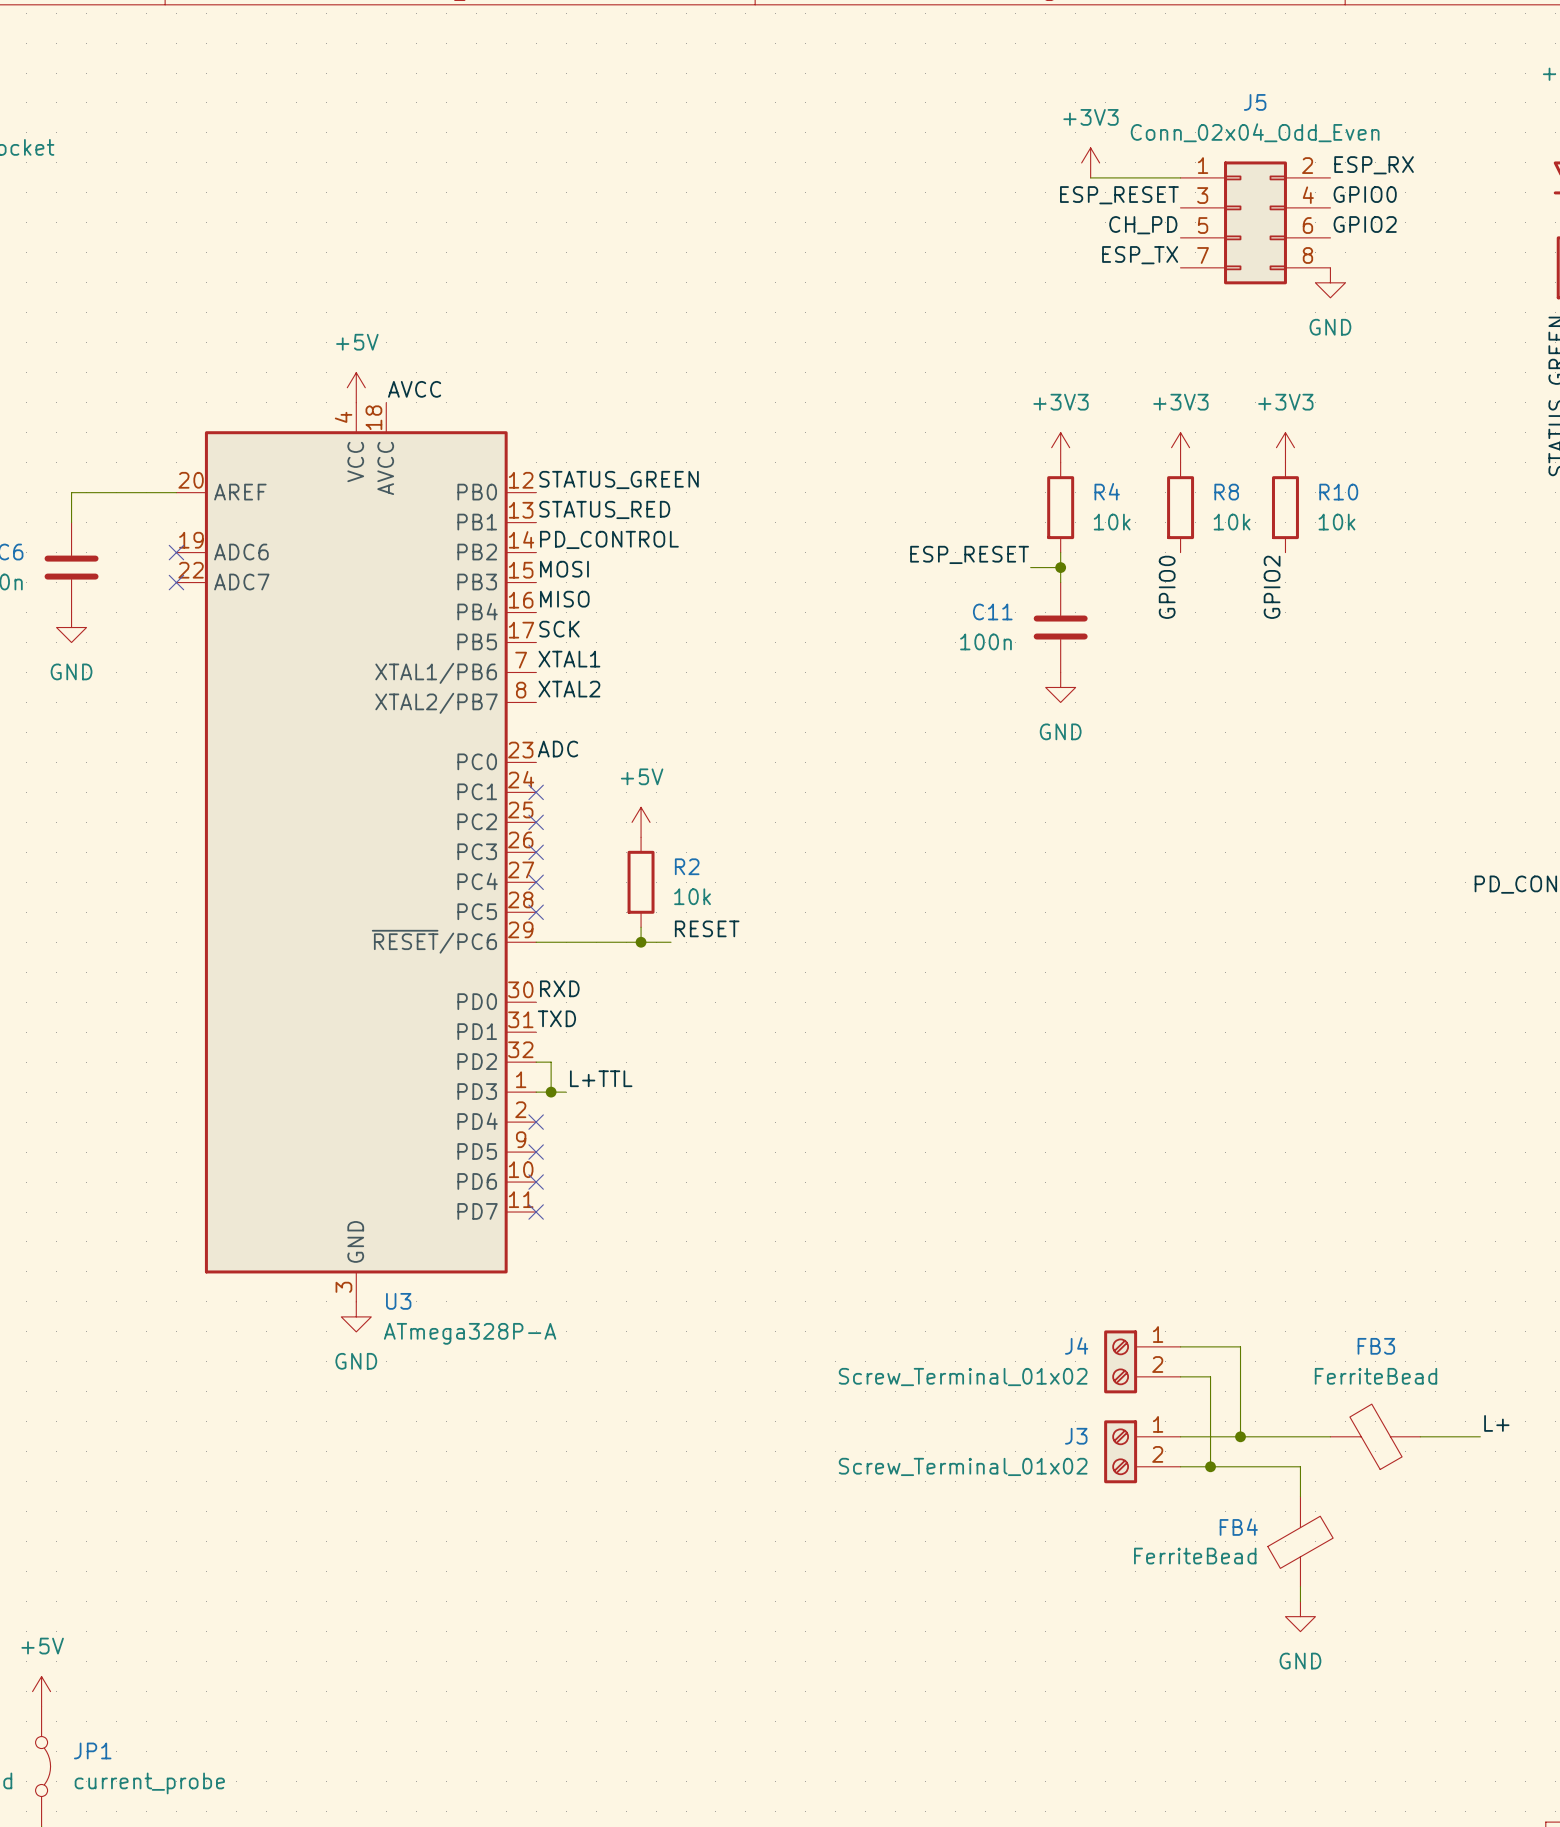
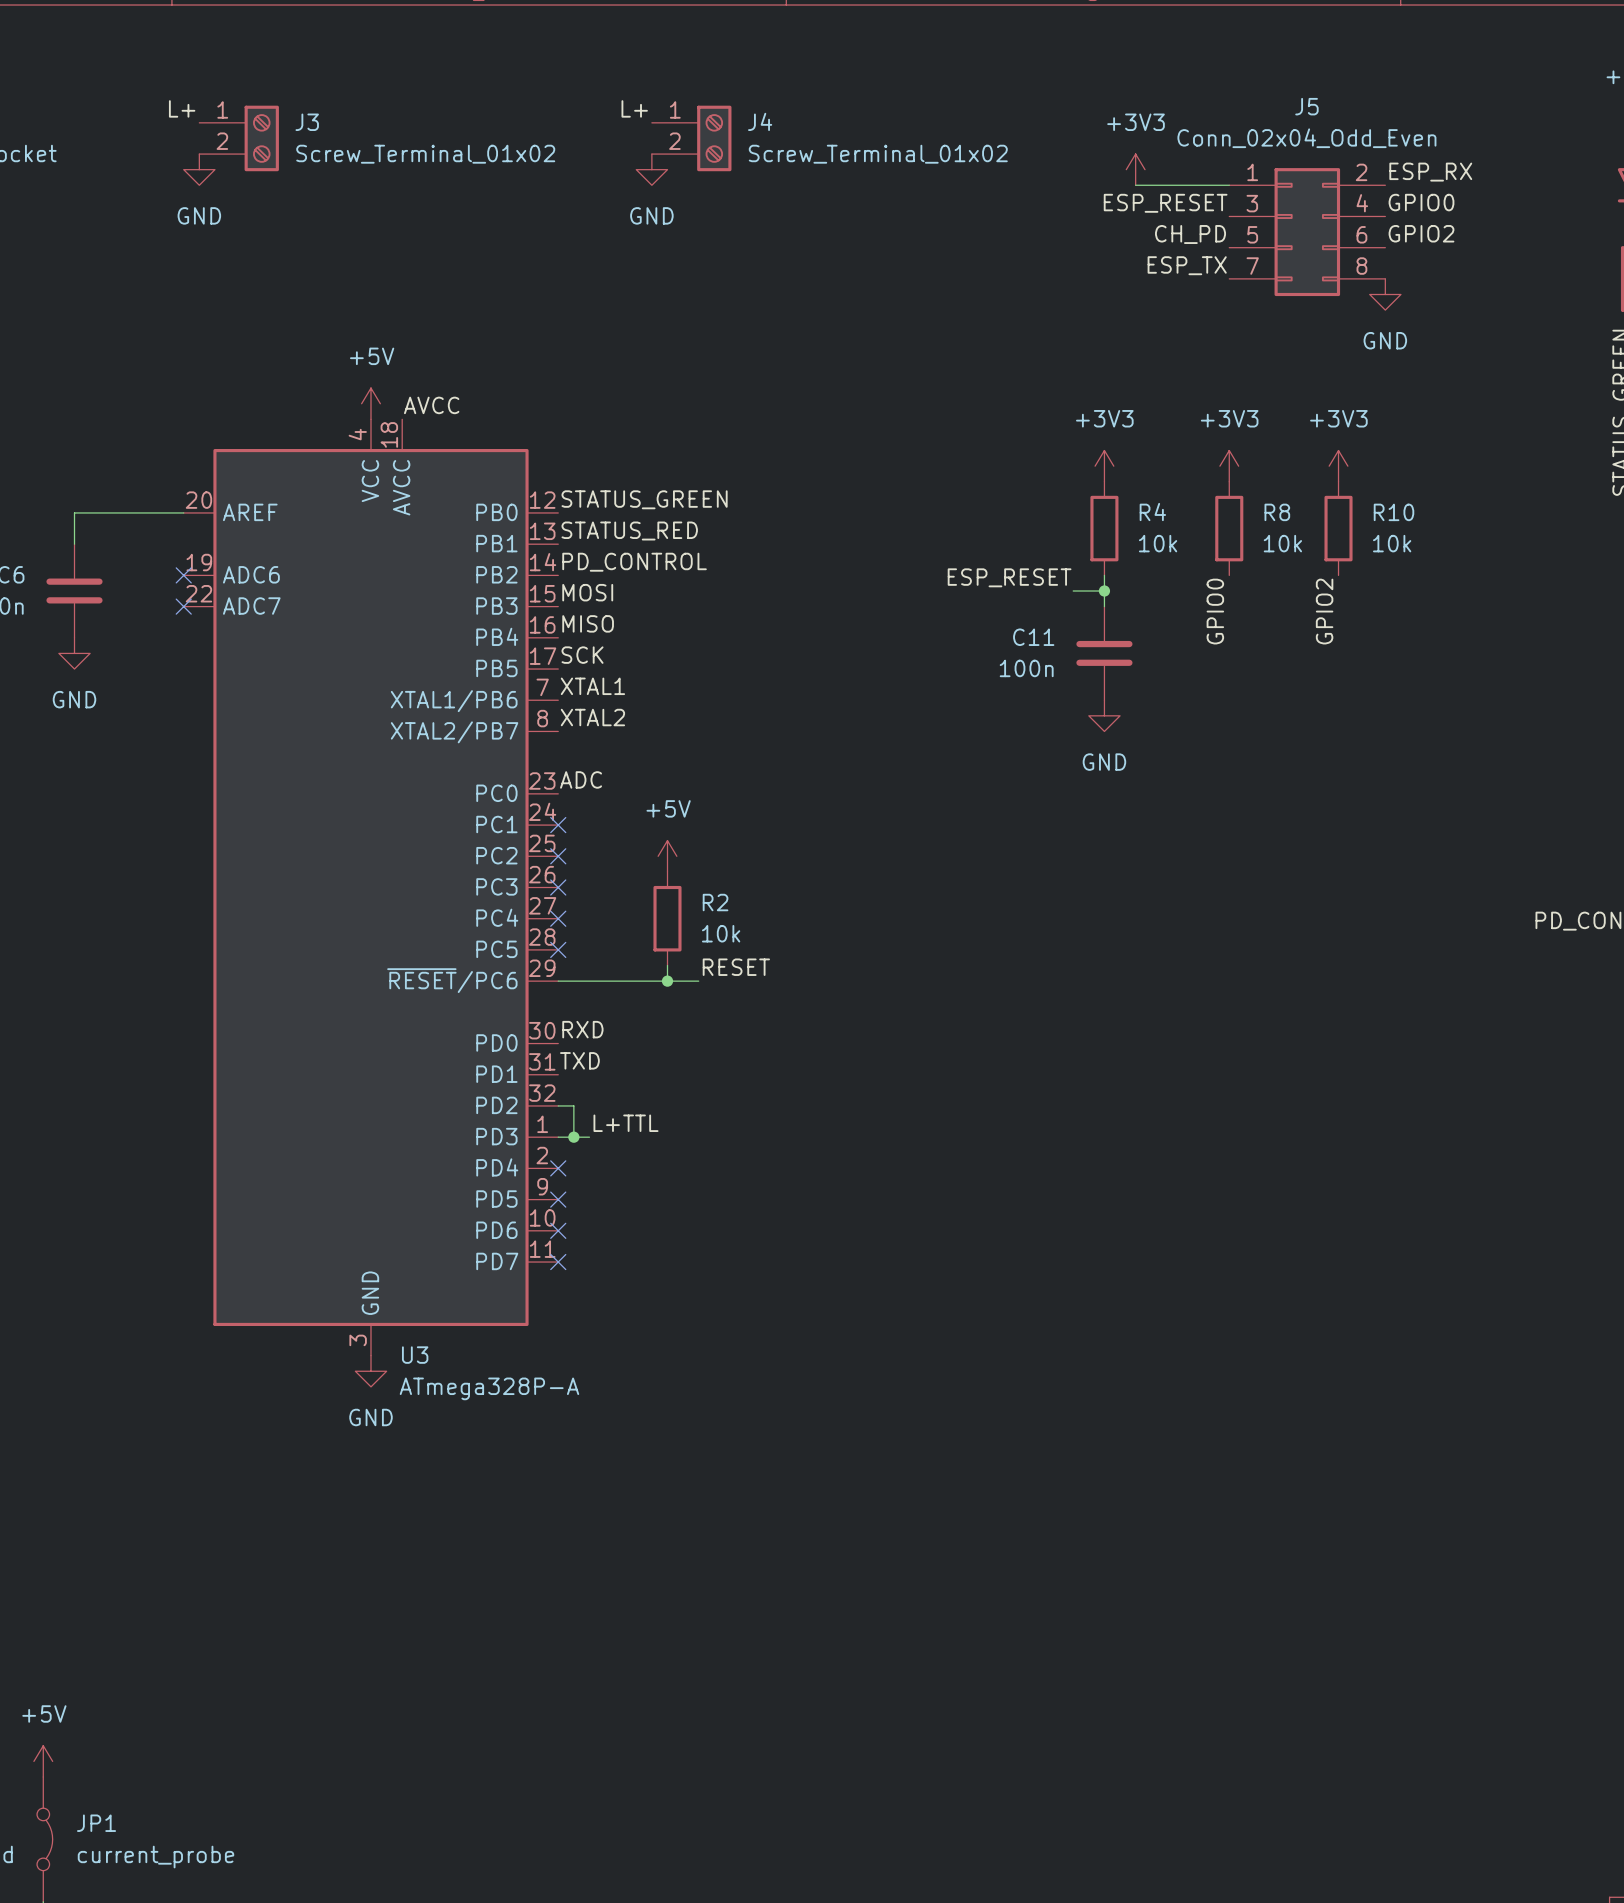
label: none -> L+ (182, 108)
label: none -> L+ (634, 108)
power symbol: none -> GND (199, 169)
power symbol: none -> GND (651, 169)
wire: (1180, 1346) (1240, 1346) (1240, 1436) -> none
J4 flip: as is (1120, 1361) -> left-right (714, 138)
J4 position: (1142, 1361) -> (691, 138)
wire: (1180, 1376) (1210, 1376) (1210, 1466) -> none
label: L+ (1496, 1423) -> none
wire: (1180, 1436) (1330, 1436) -> none
junction: (1240, 1436) -> none
FB3: FerriteBead (1375, 1436) -> none
wire: (1420, 1436) (1480, 1436) -> none
J3 flip: as is (1120, 1451) -> left-right (261, 138)
J3 position: (1142, 1451) -> (239, 138)
wire: (1180, 1466) (1300, 1466) (1300, 1496) -> none
junction: (1210, 1466) -> none
FB4: FerriteBead (1300, 1541) -> none
wire: (1300, 1586) (1300, 1601) -> none
power symbol: GND (1300, 1616) -> none

